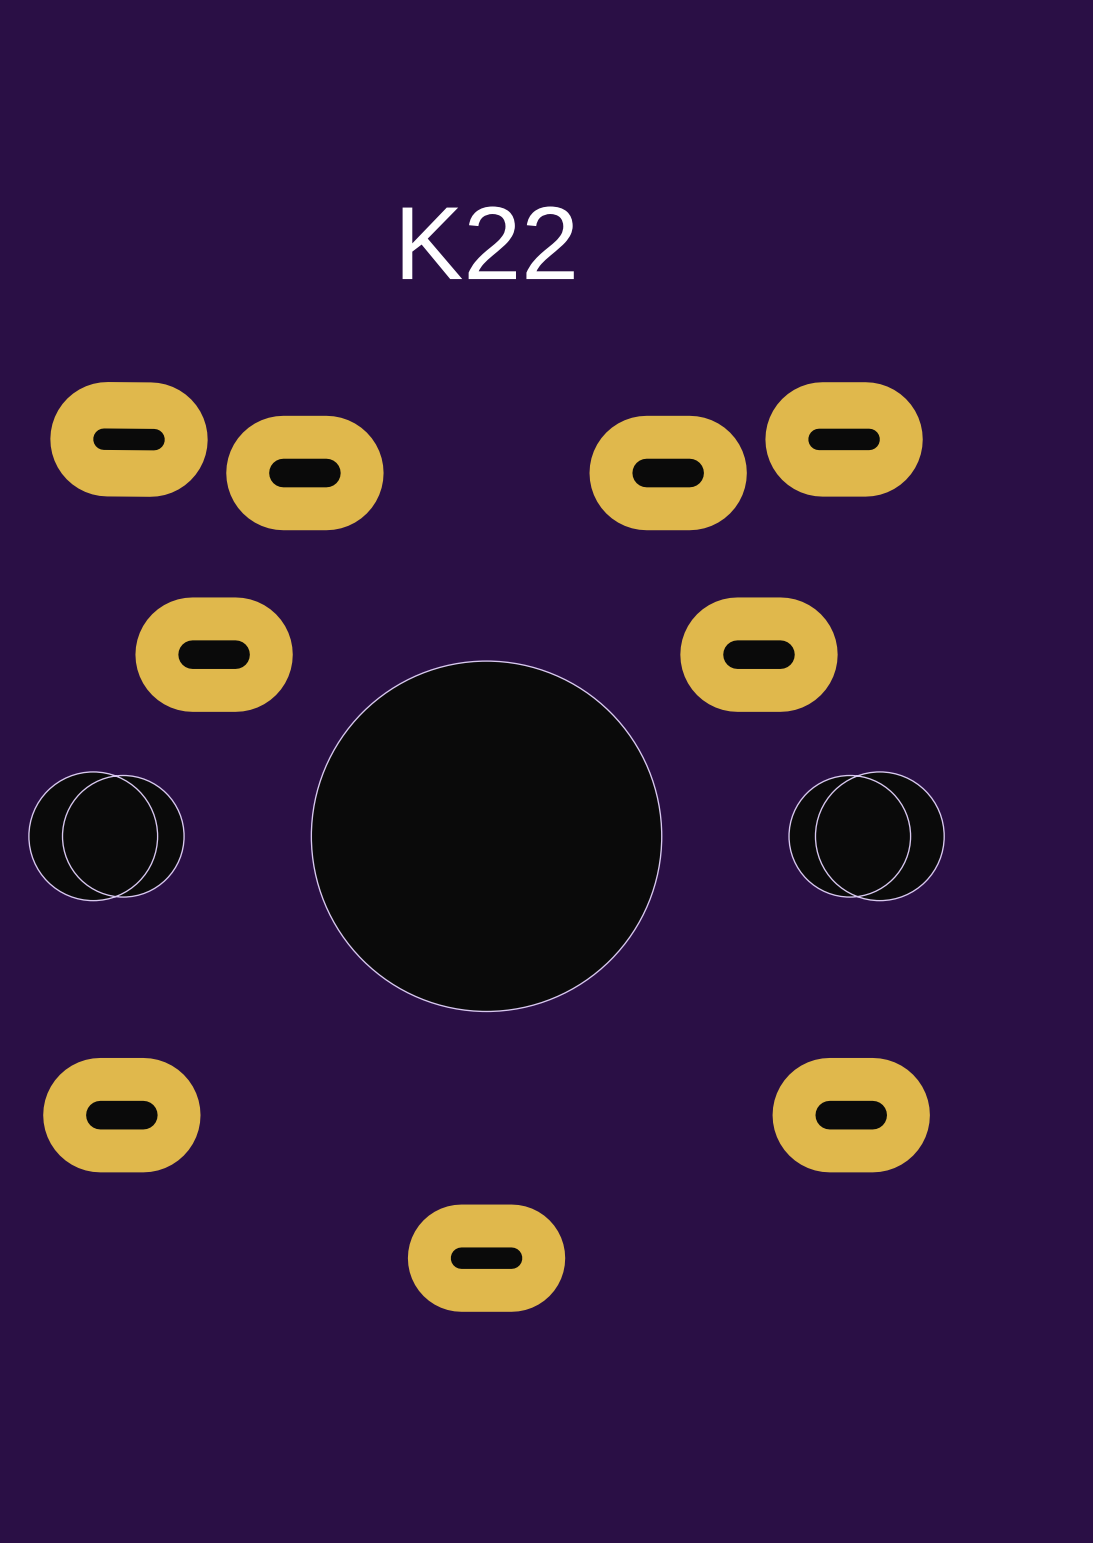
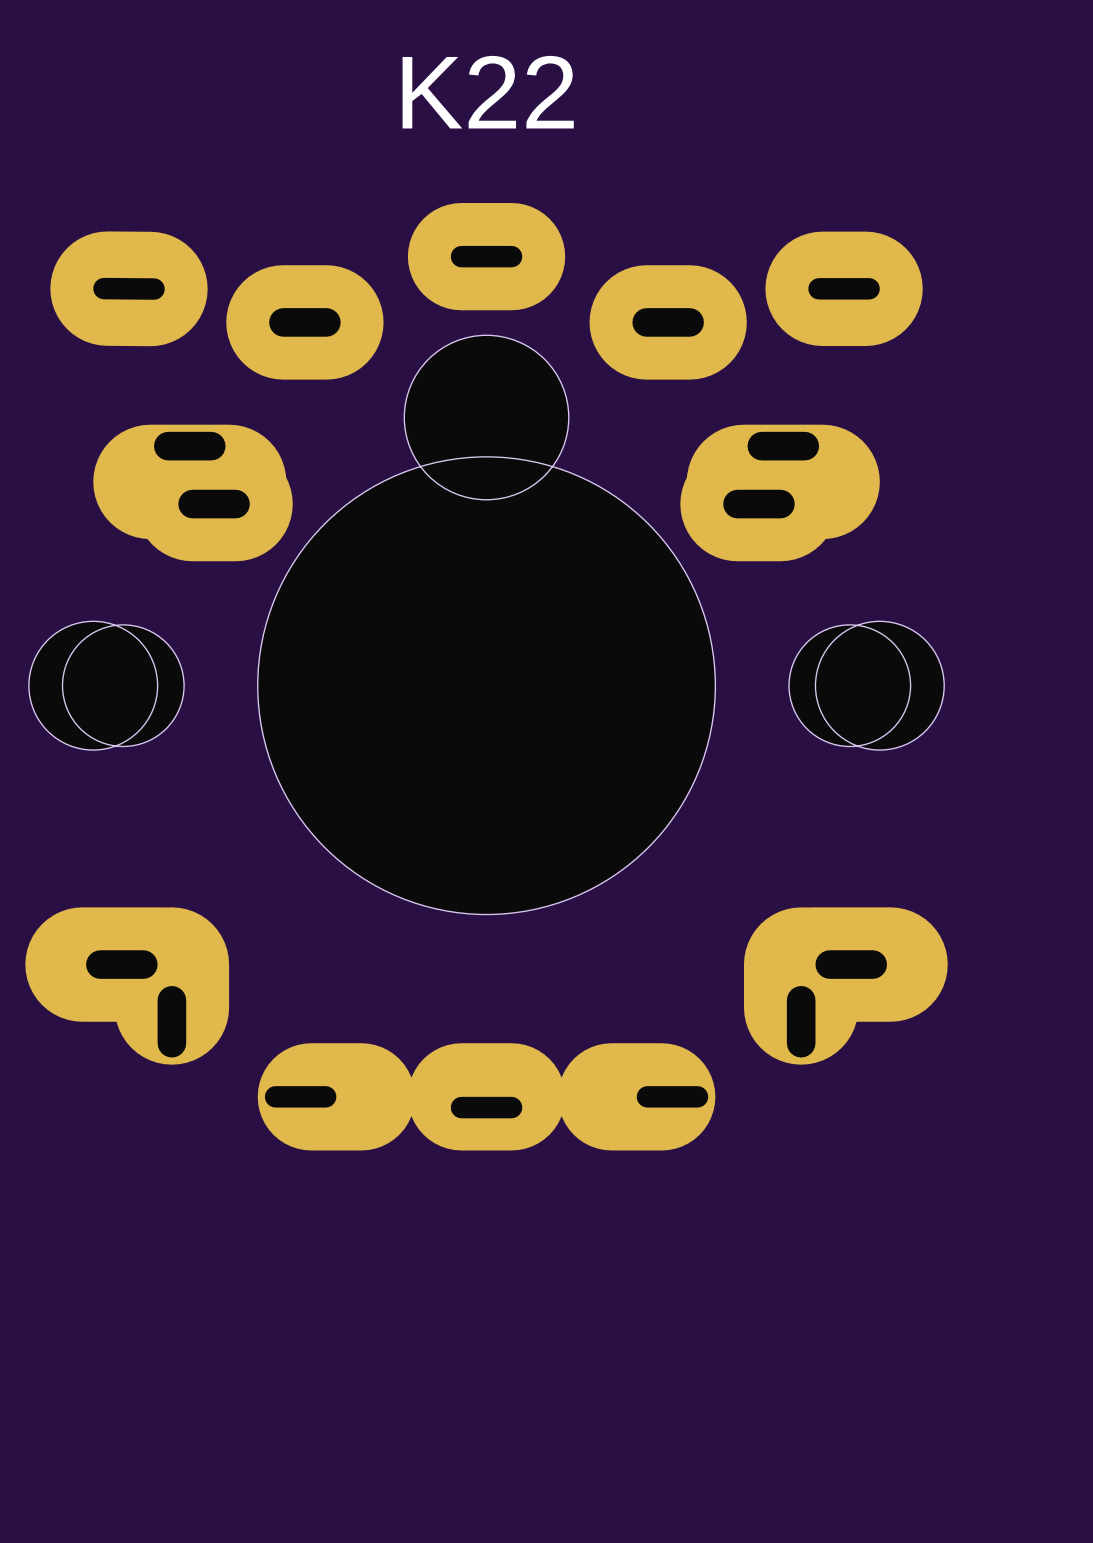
K22 footprint: [28, 382, 945, 1312] -> [25, 203, 948, 1151]

